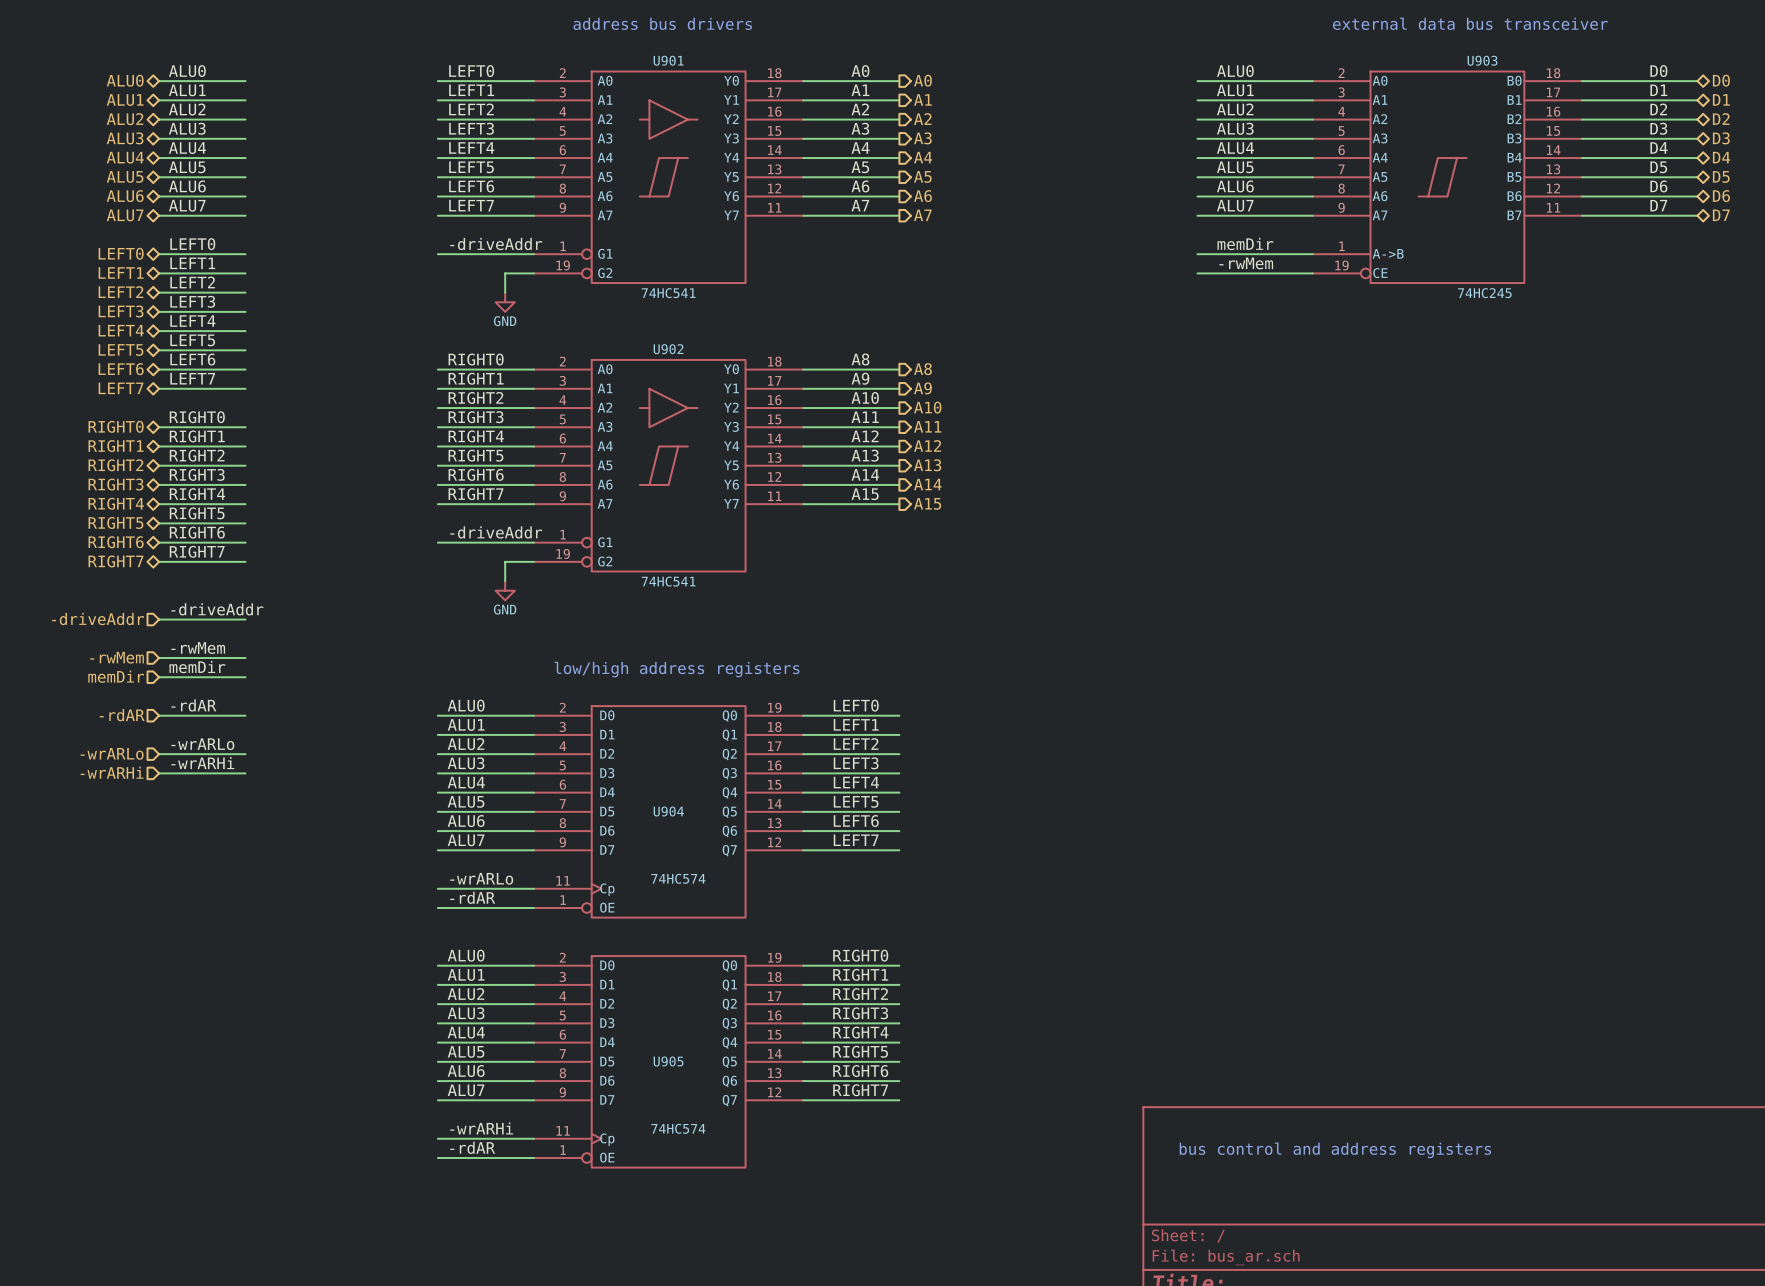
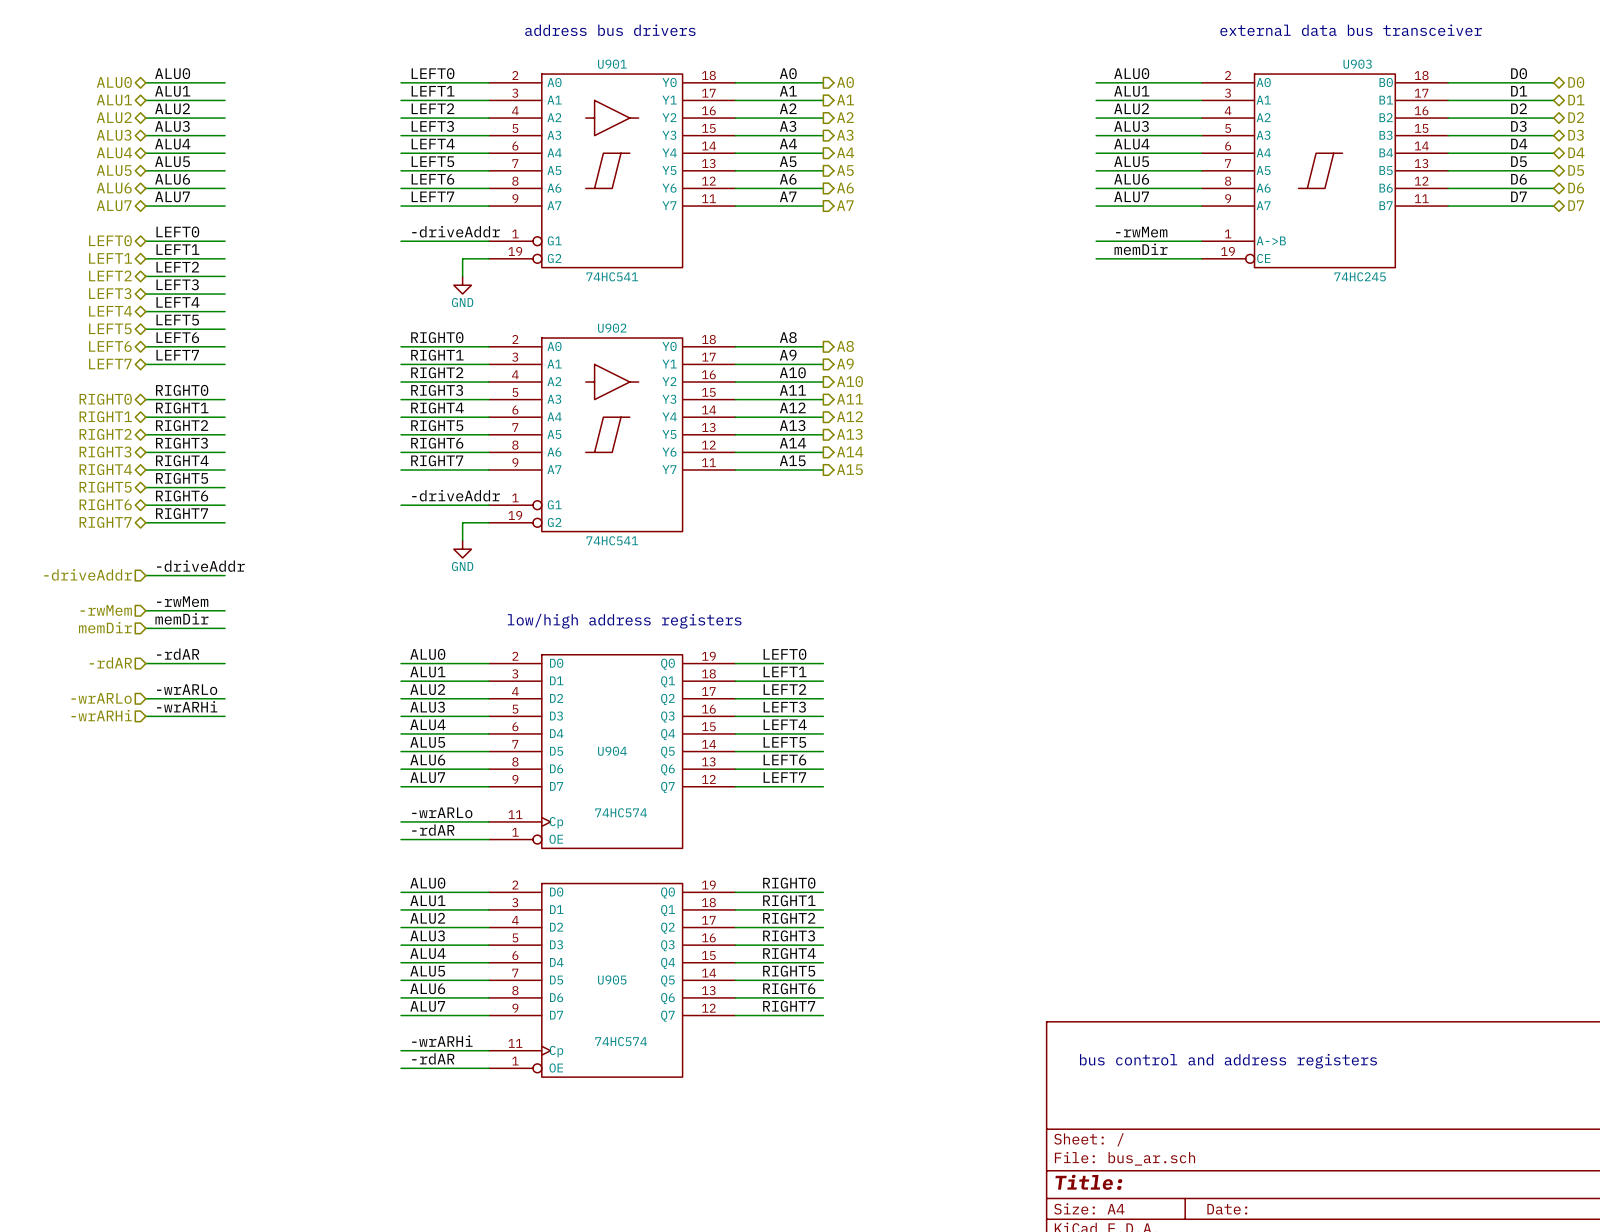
label: memDir (1245, 243) -> -rwMem (1141, 232)
label: -rwMem (1246, 263) -> memDir (1141, 249)

